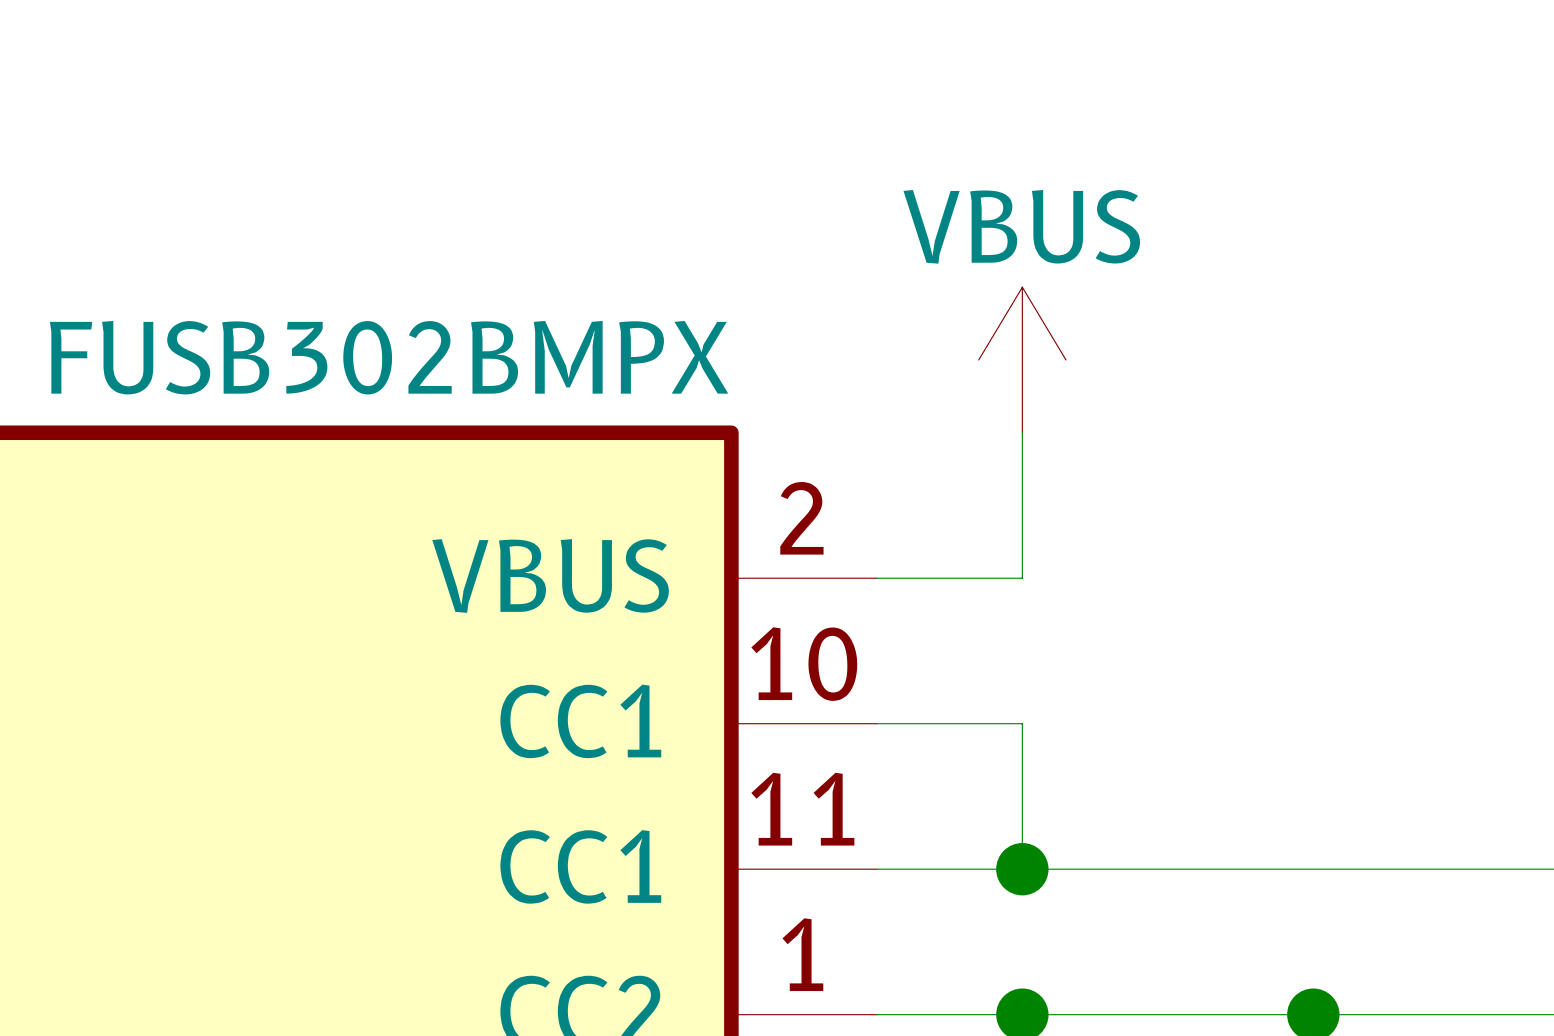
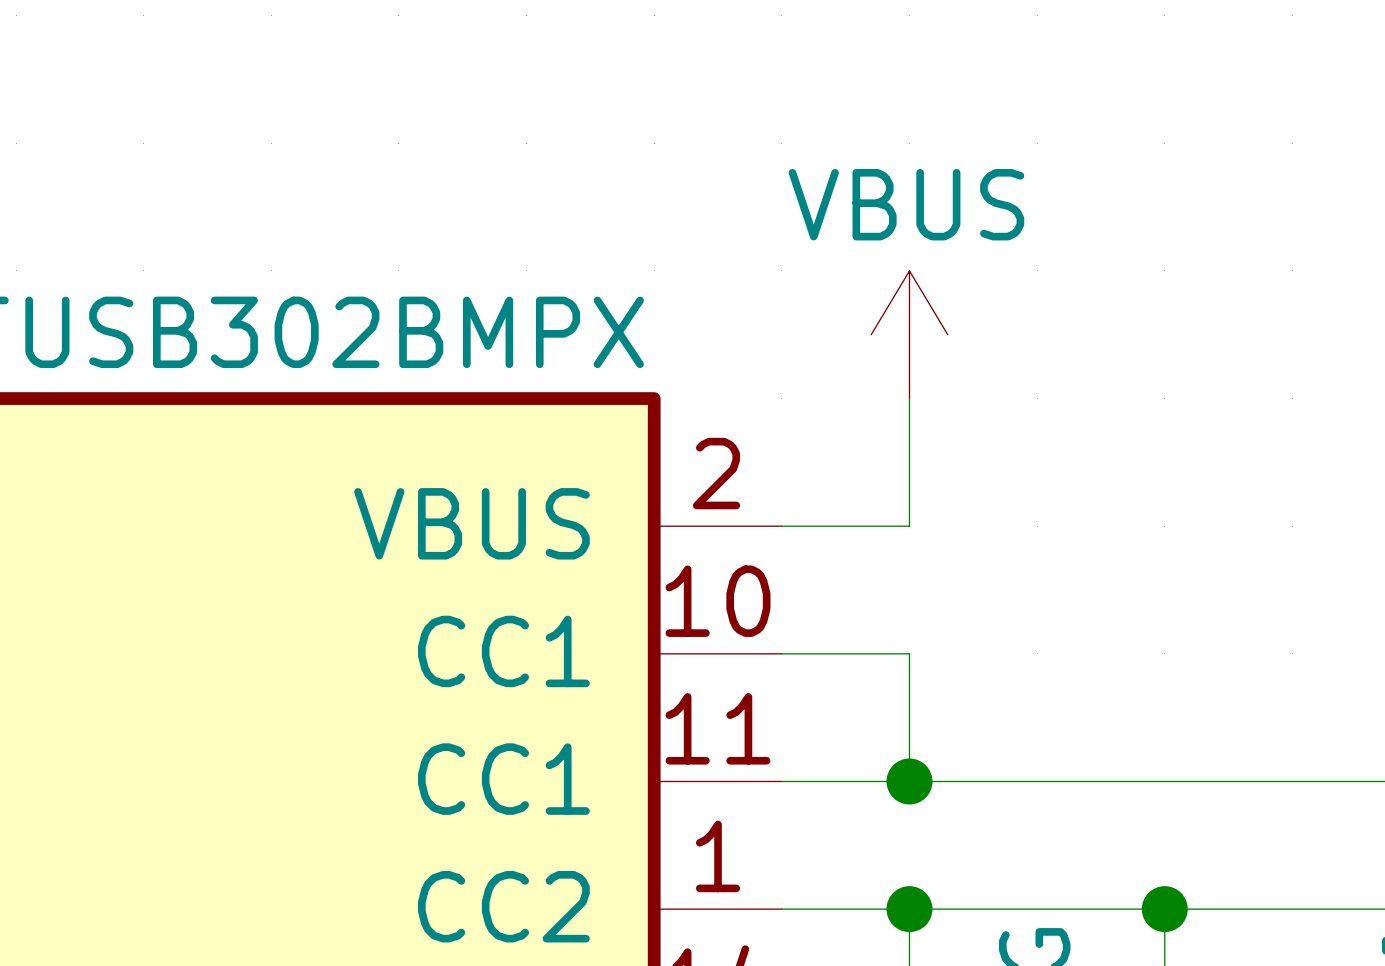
power symbol text position: VBUS (1021, 226) -> VBUS (906, 204)

